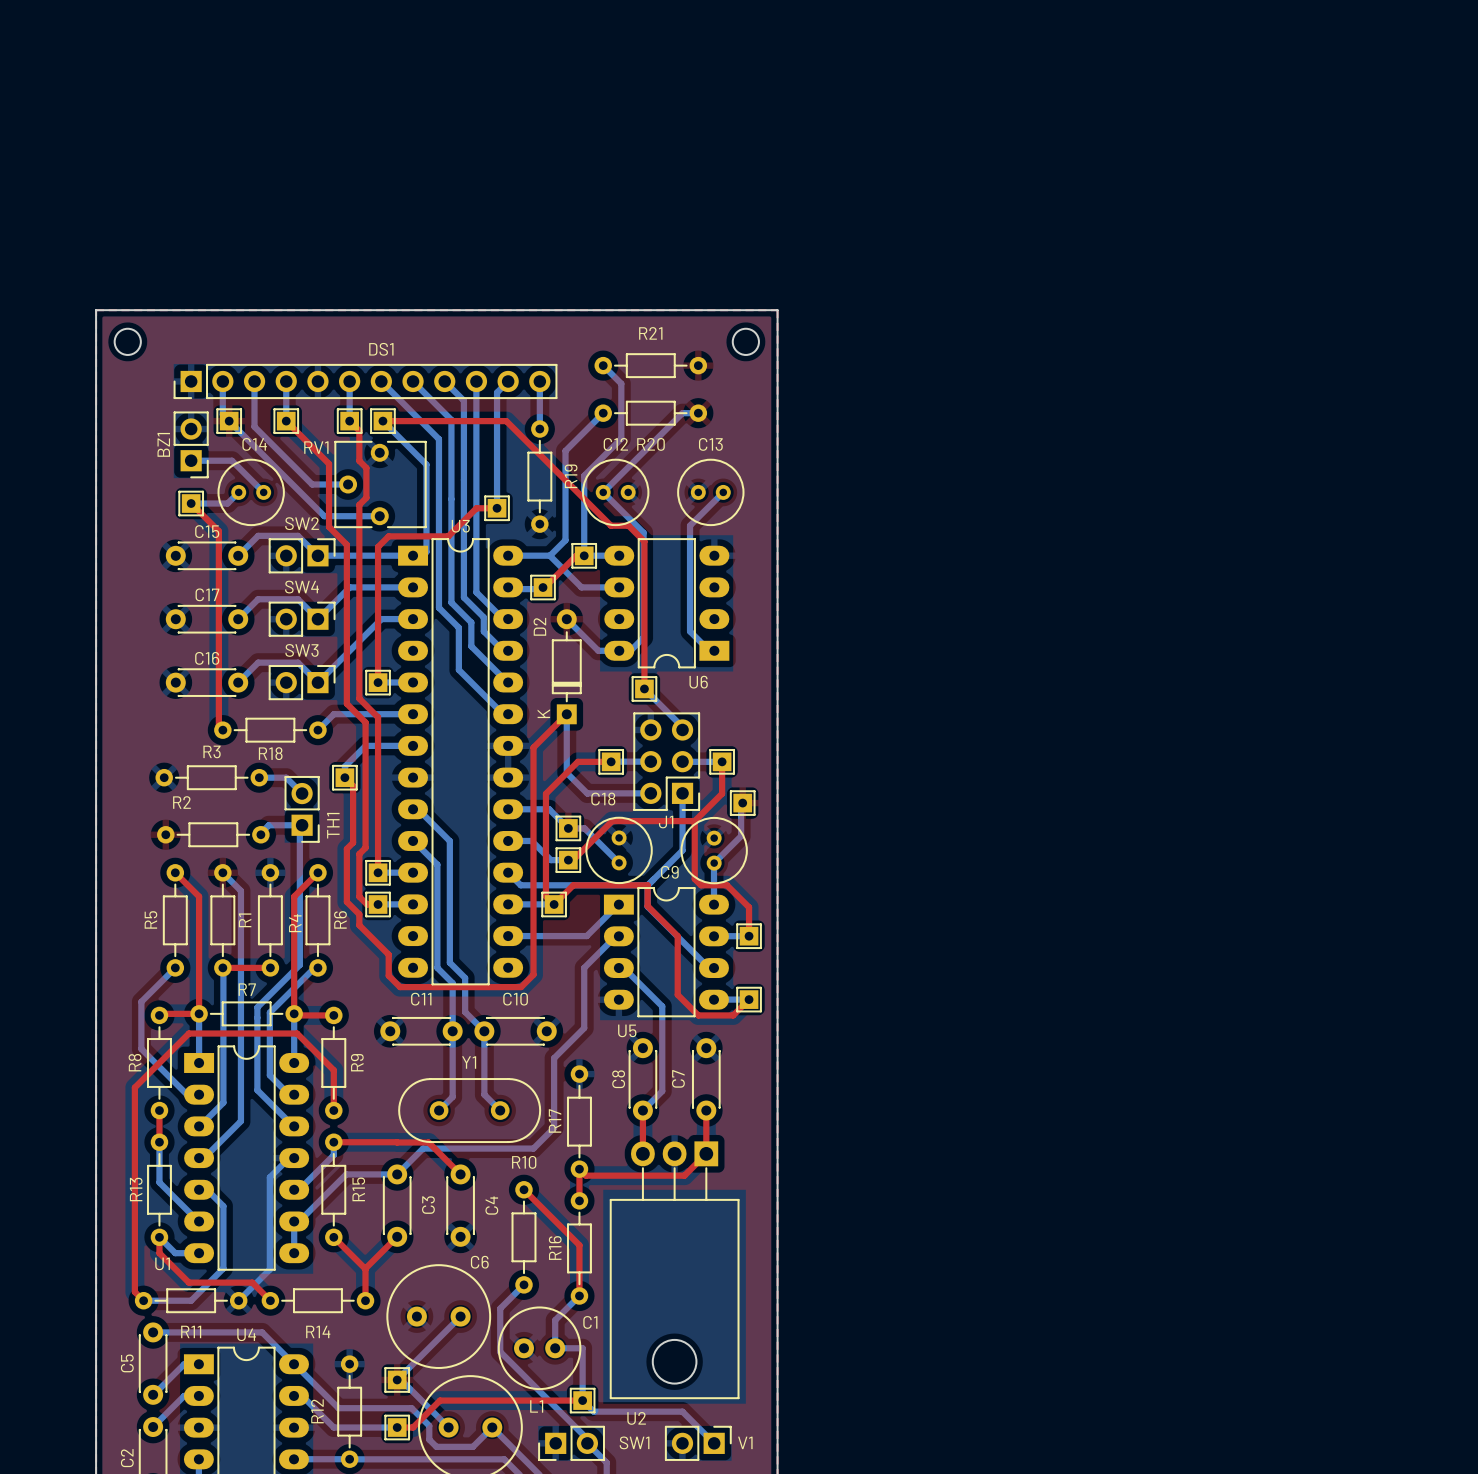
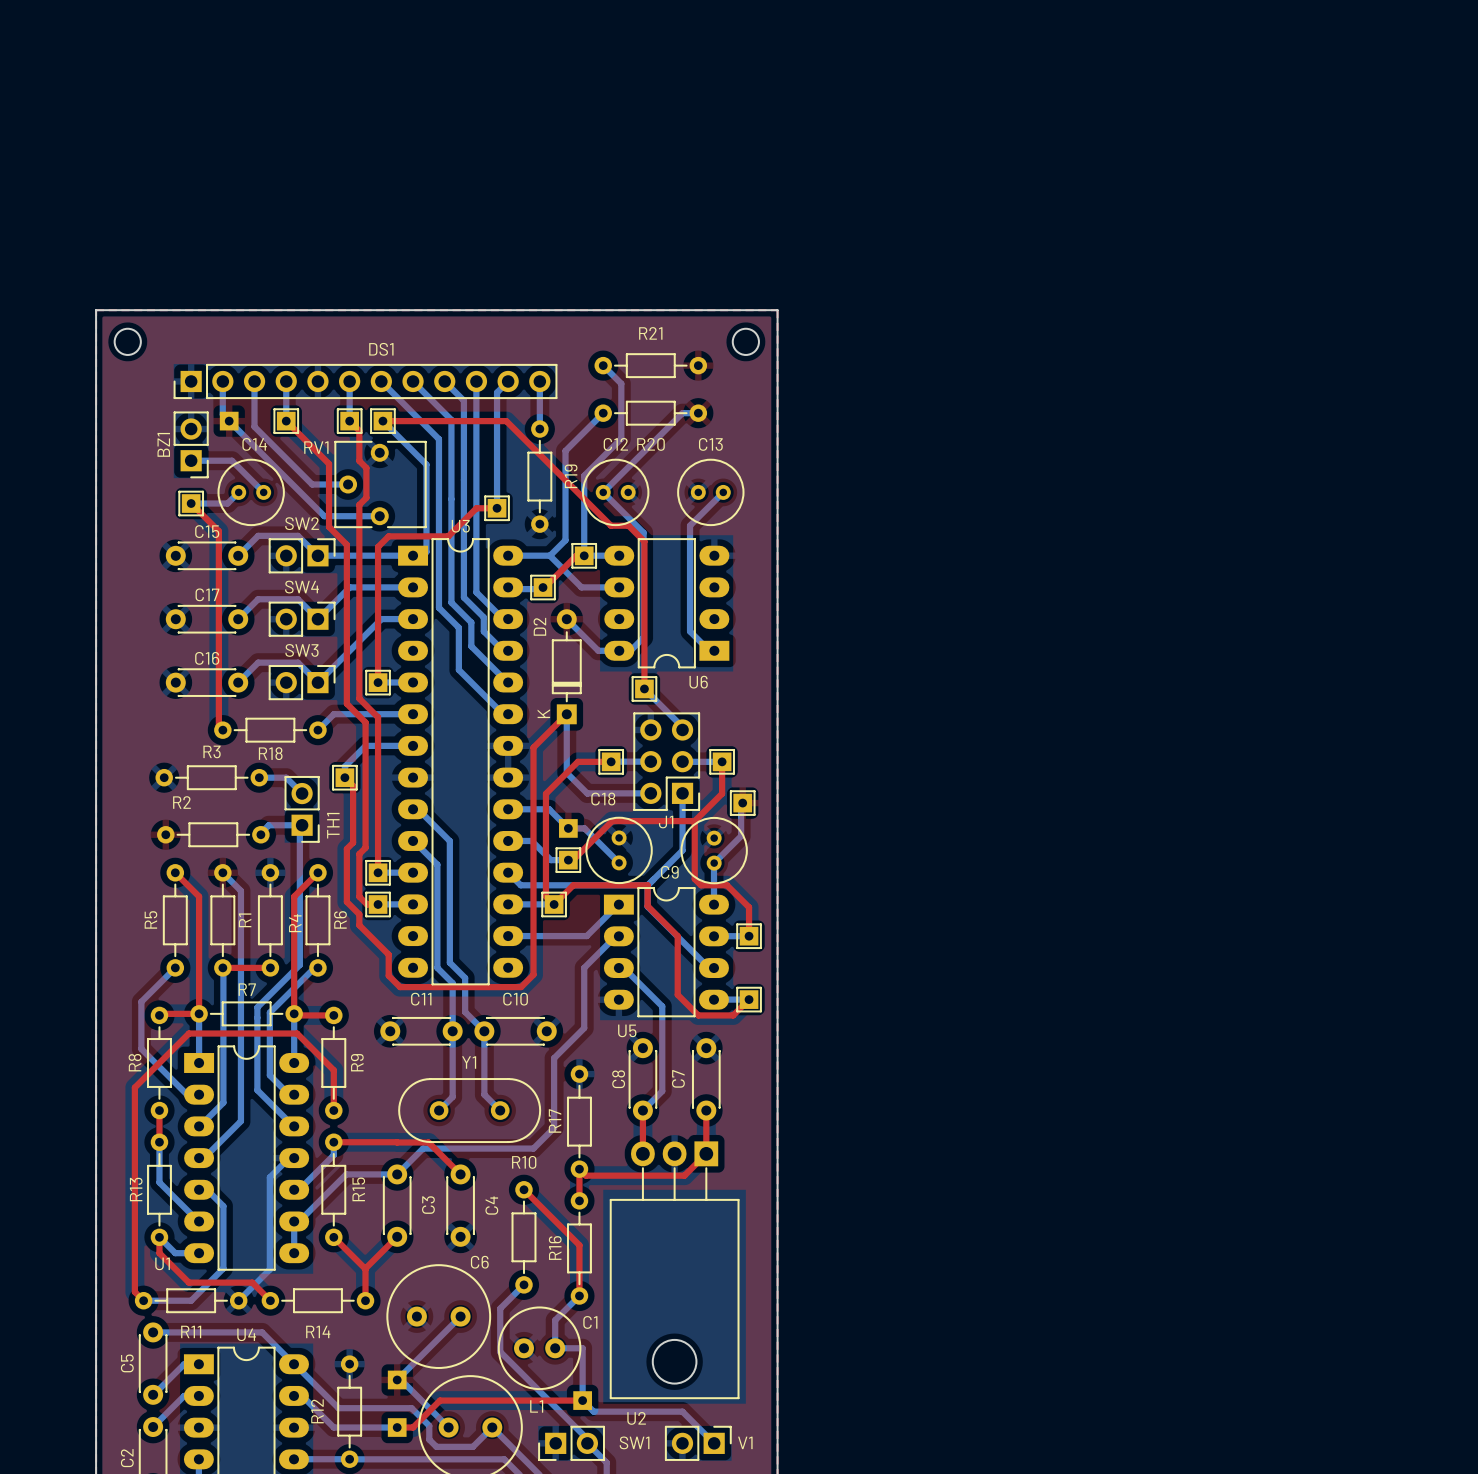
part footprint: [216, 408, 242, 434] -> [219, 411, 239, 431]
part footprint: [555, 815, 581, 842] -> [559, 819, 578, 838]
part footprint: [384, 1367, 410, 1393] -> [387, 1370, 407, 1390]
part footprint: [570, 1387, 596, 1414] -> [573, 1391, 592, 1410]
part footprint: [384, 1414, 410, 1441] -> [387, 1418, 407, 1437]

